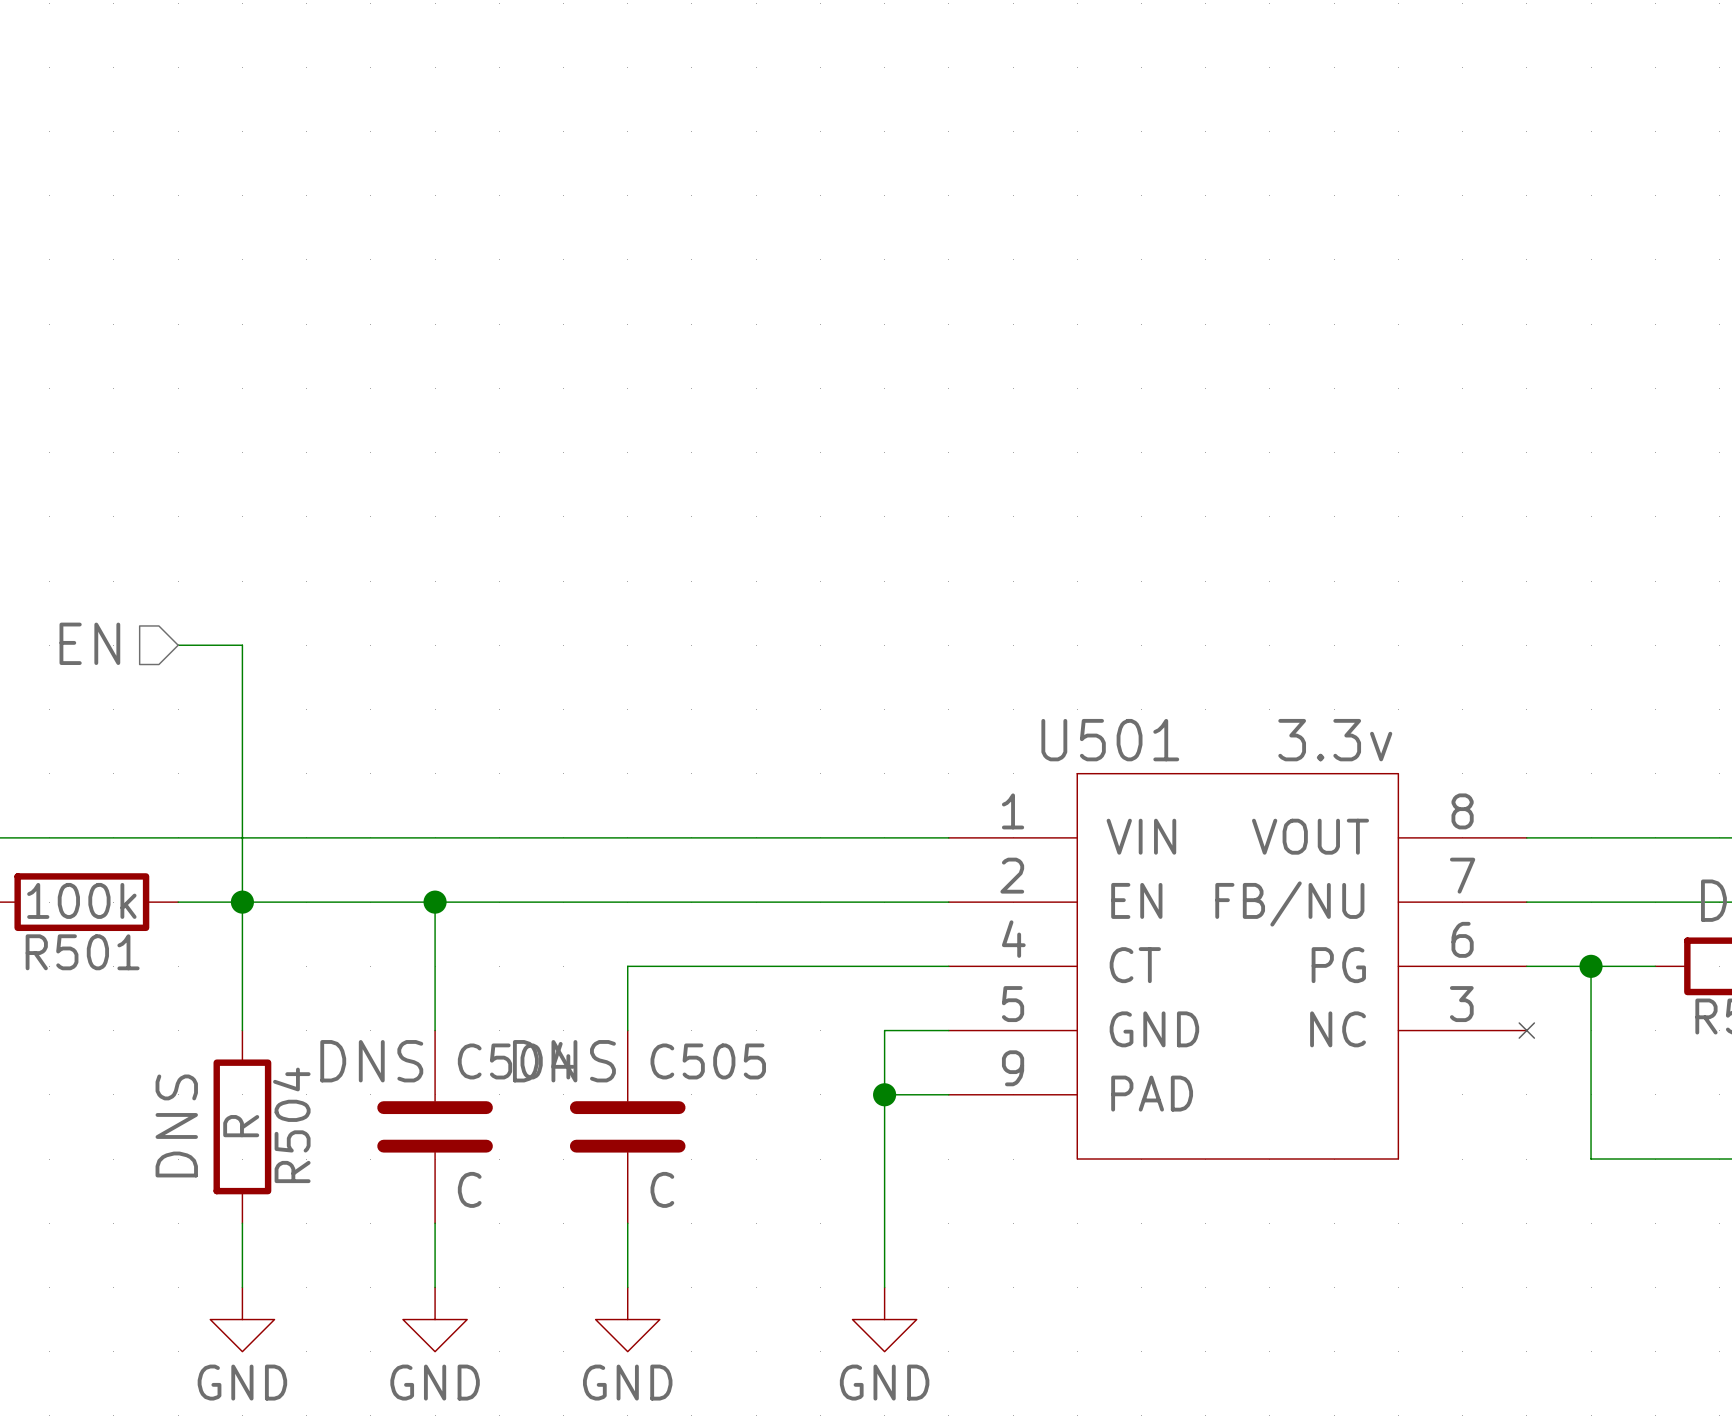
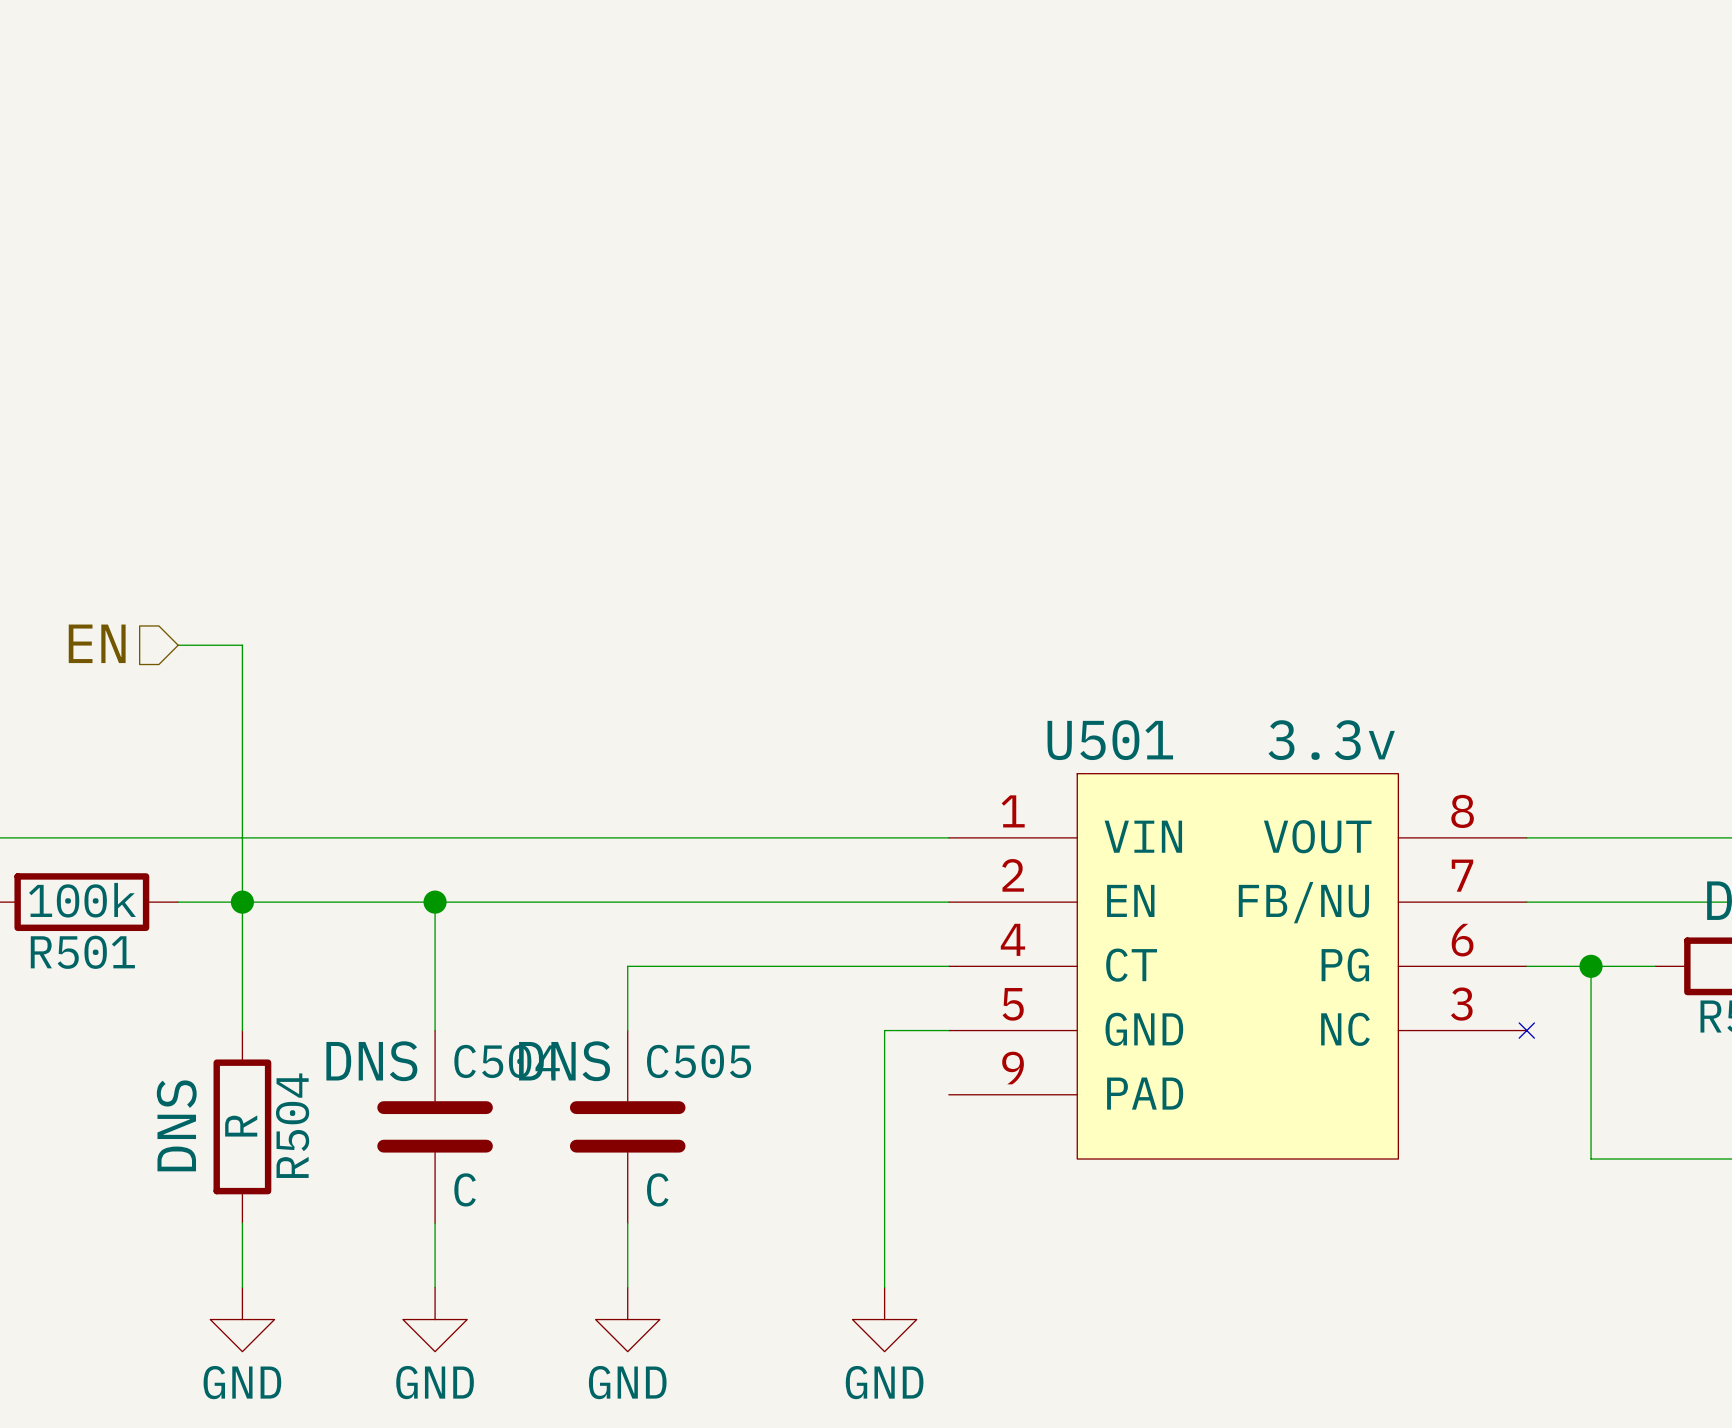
wire: (884, 1094) (948, 1094) -> none
junction: (884, 1094) -> none

